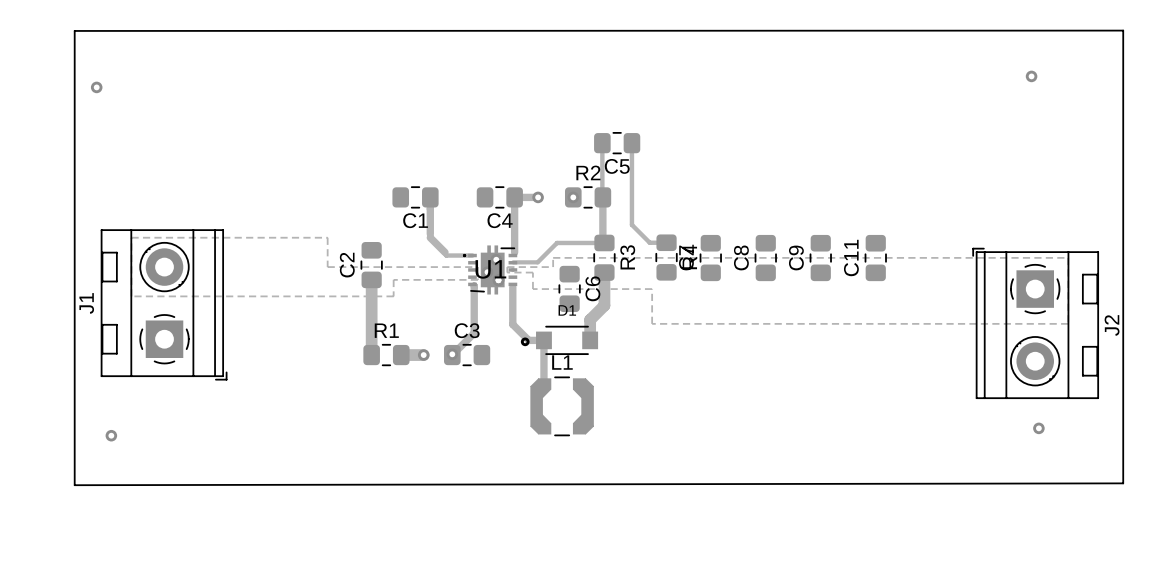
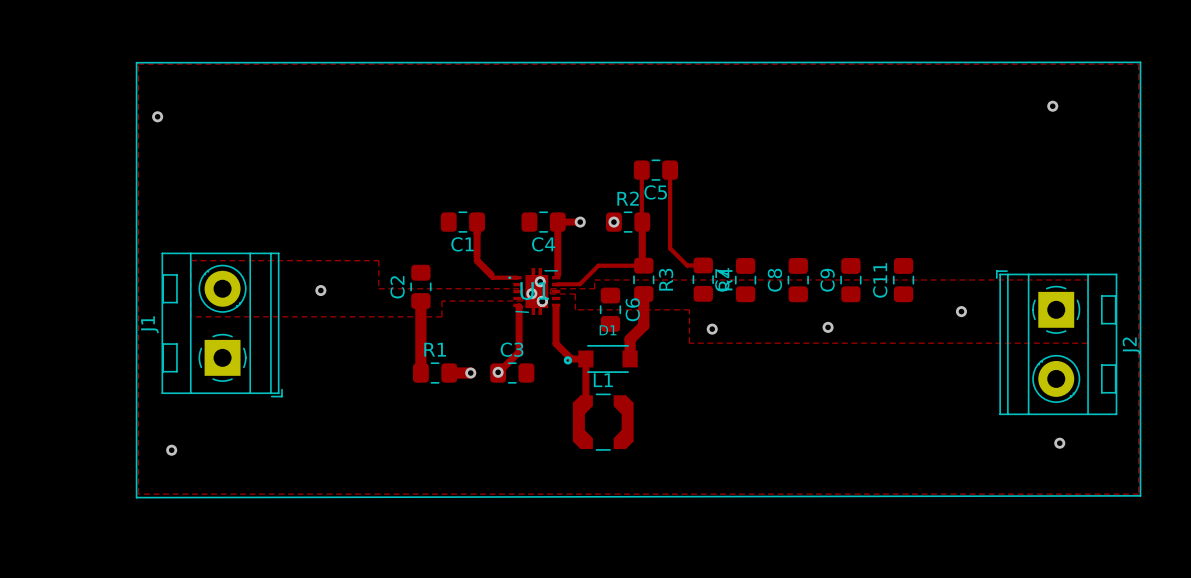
zone outline: none -> (138, 64) (1138, 64) (1138, 494) (138, 494) (138, 64)
via: none -> (320, 290)
via: none -> (961, 311)
via: none -> (828, 327)
via: none -> (712, 329)

